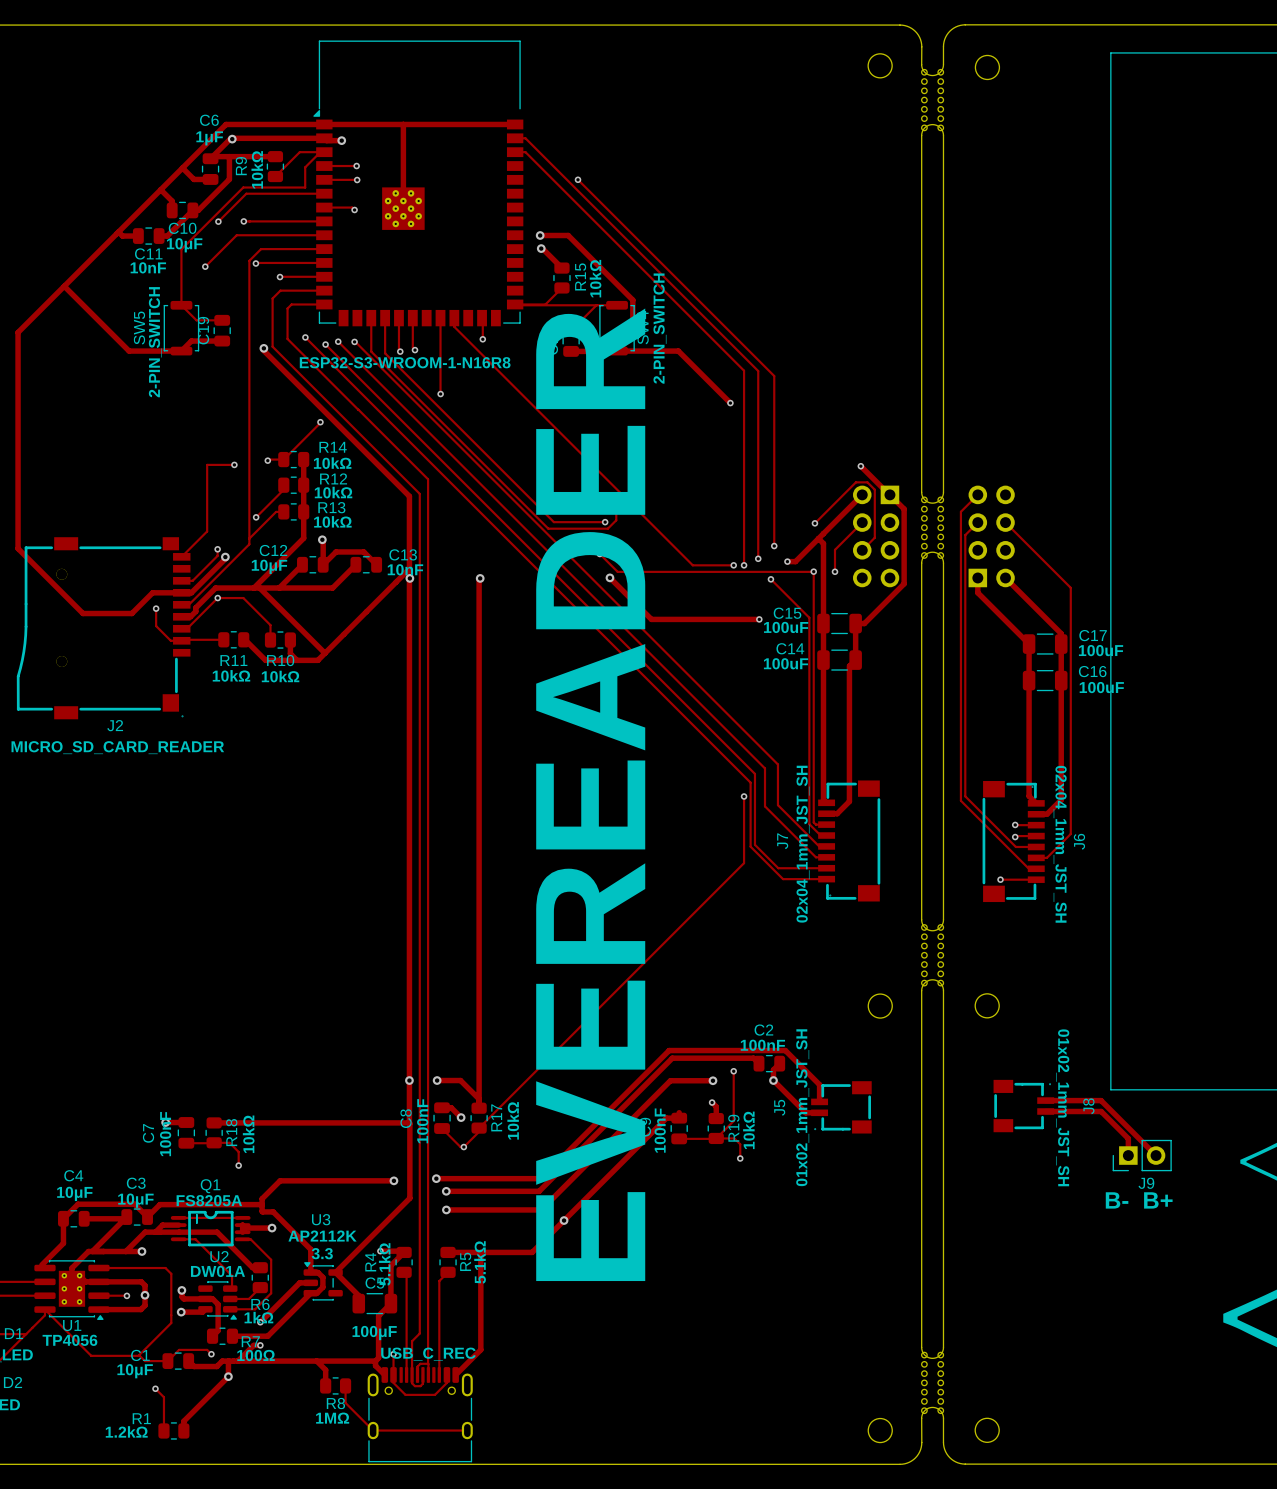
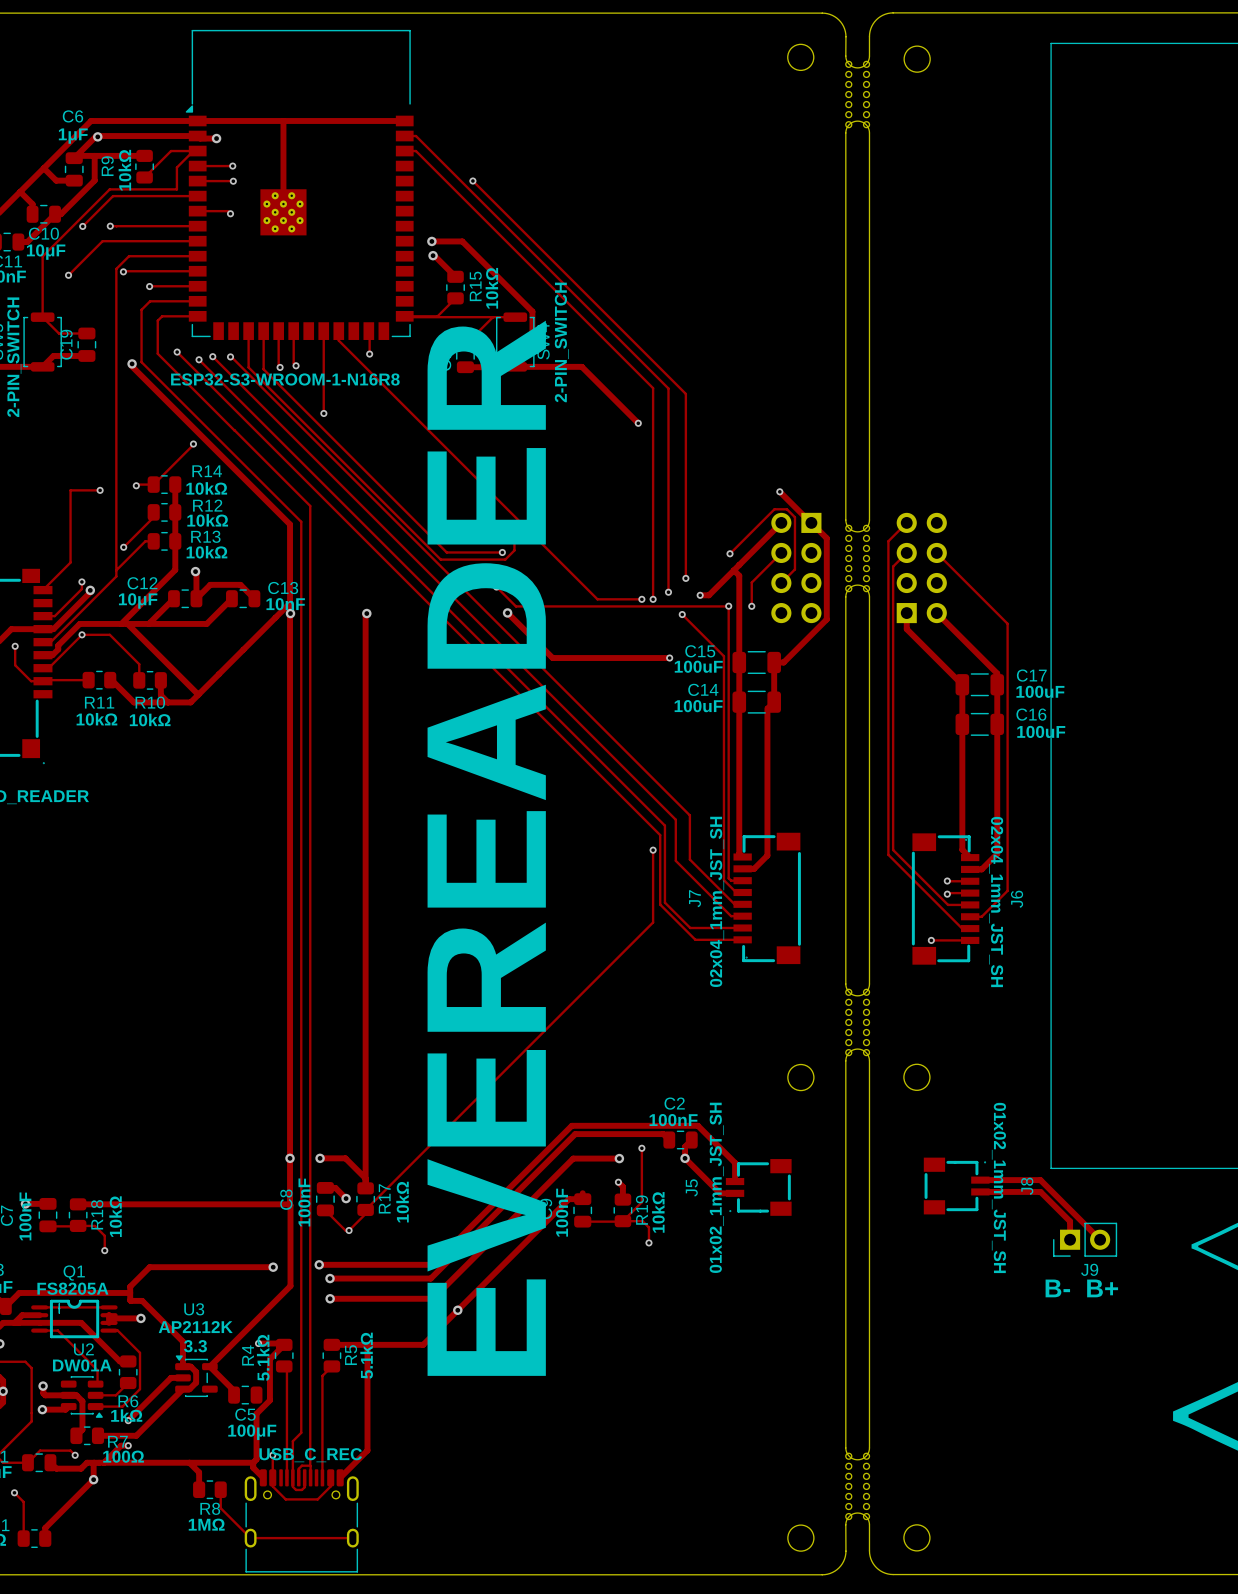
C5 name position: C5 (374, 1283) -> C5 (245, 1414)
C5 footprint: [352, 1293, 398, 1315] -> [228, 1385, 263, 1405]

